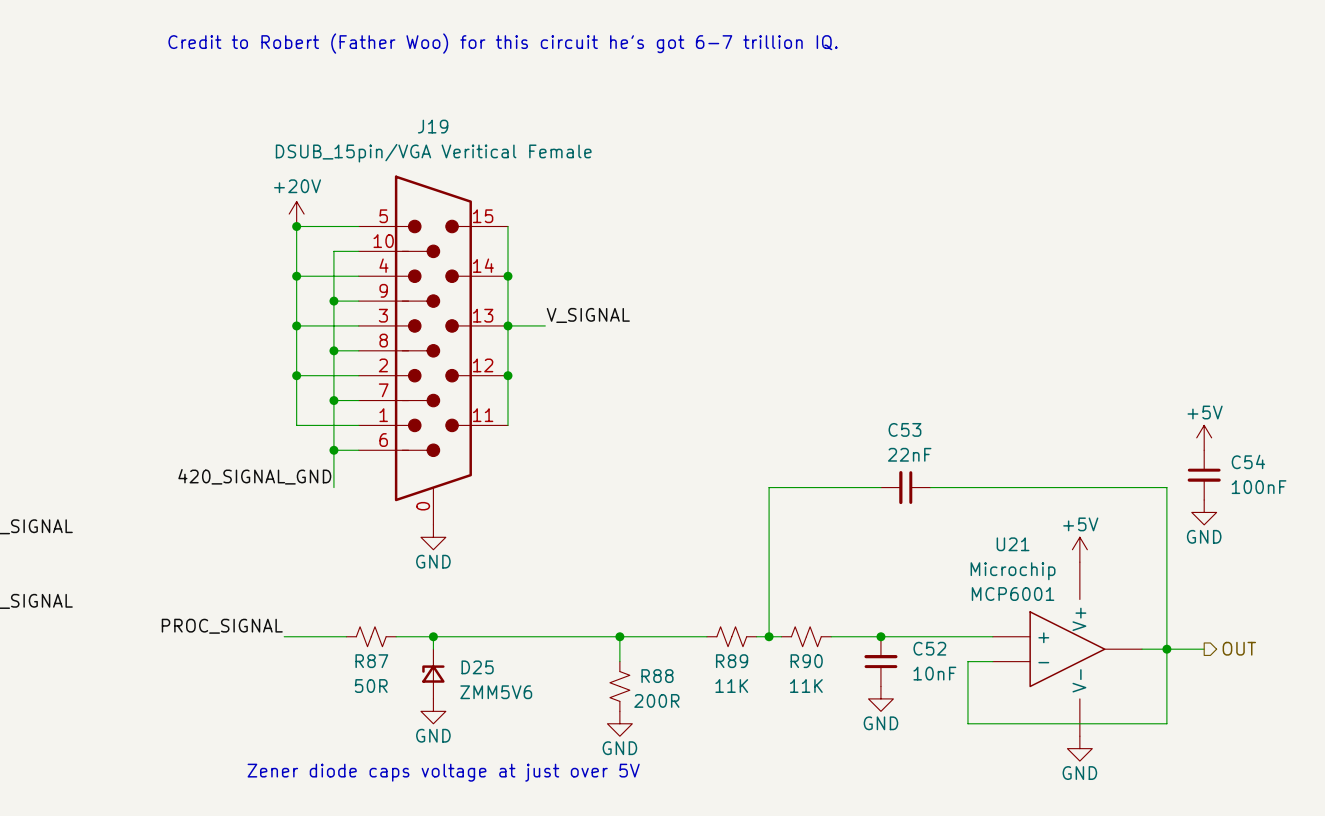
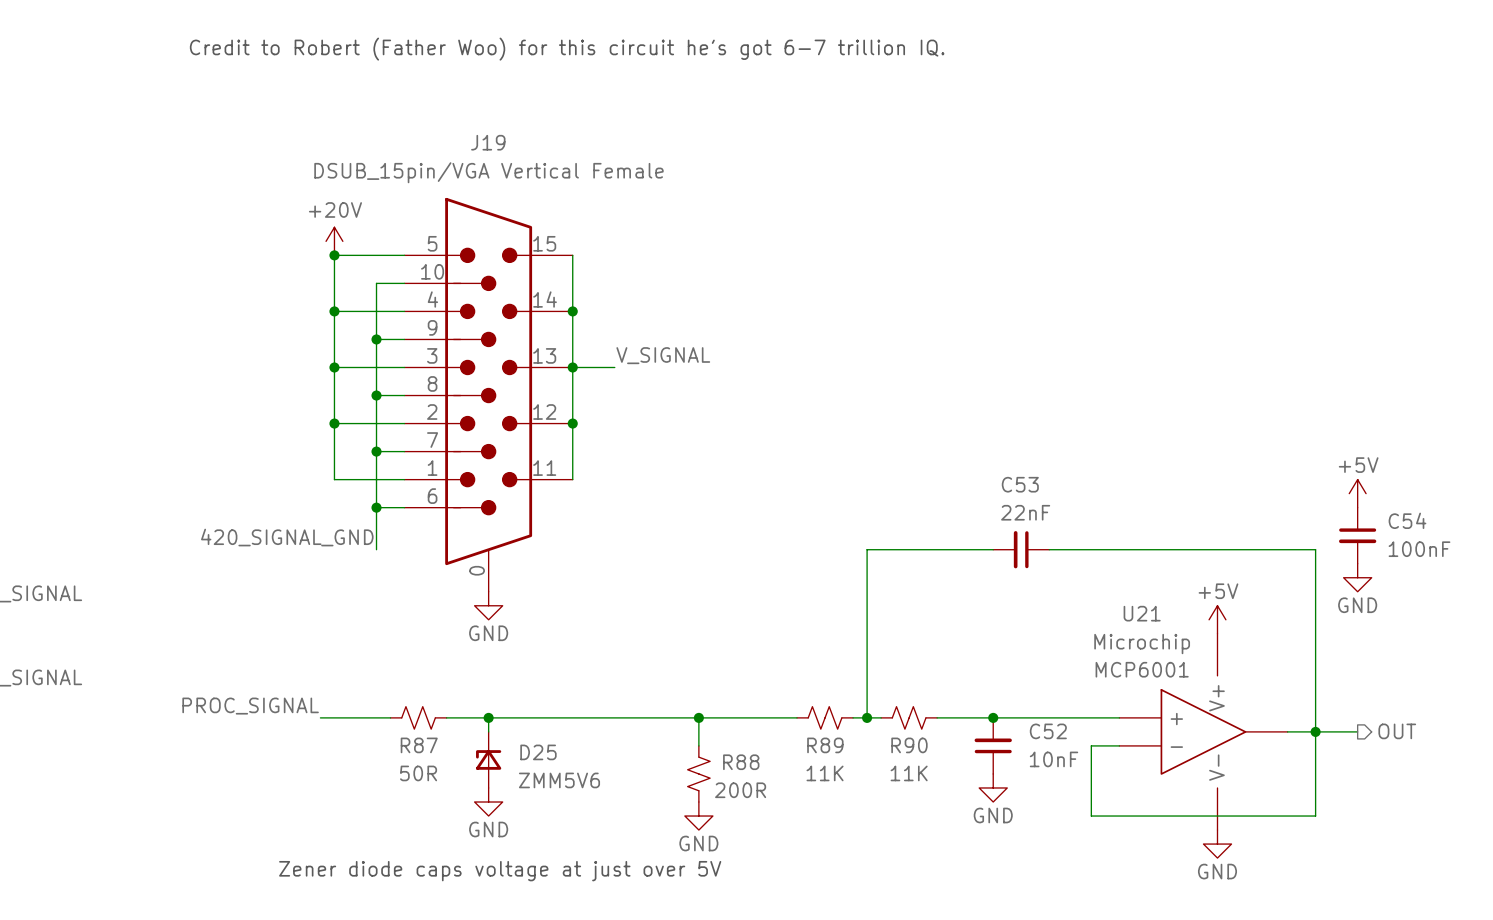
J19 value: DSUB_15pin/VGA Veritical Female (433, 153) -> DSUB_15pin/VGA Vertical Female (488, 172)

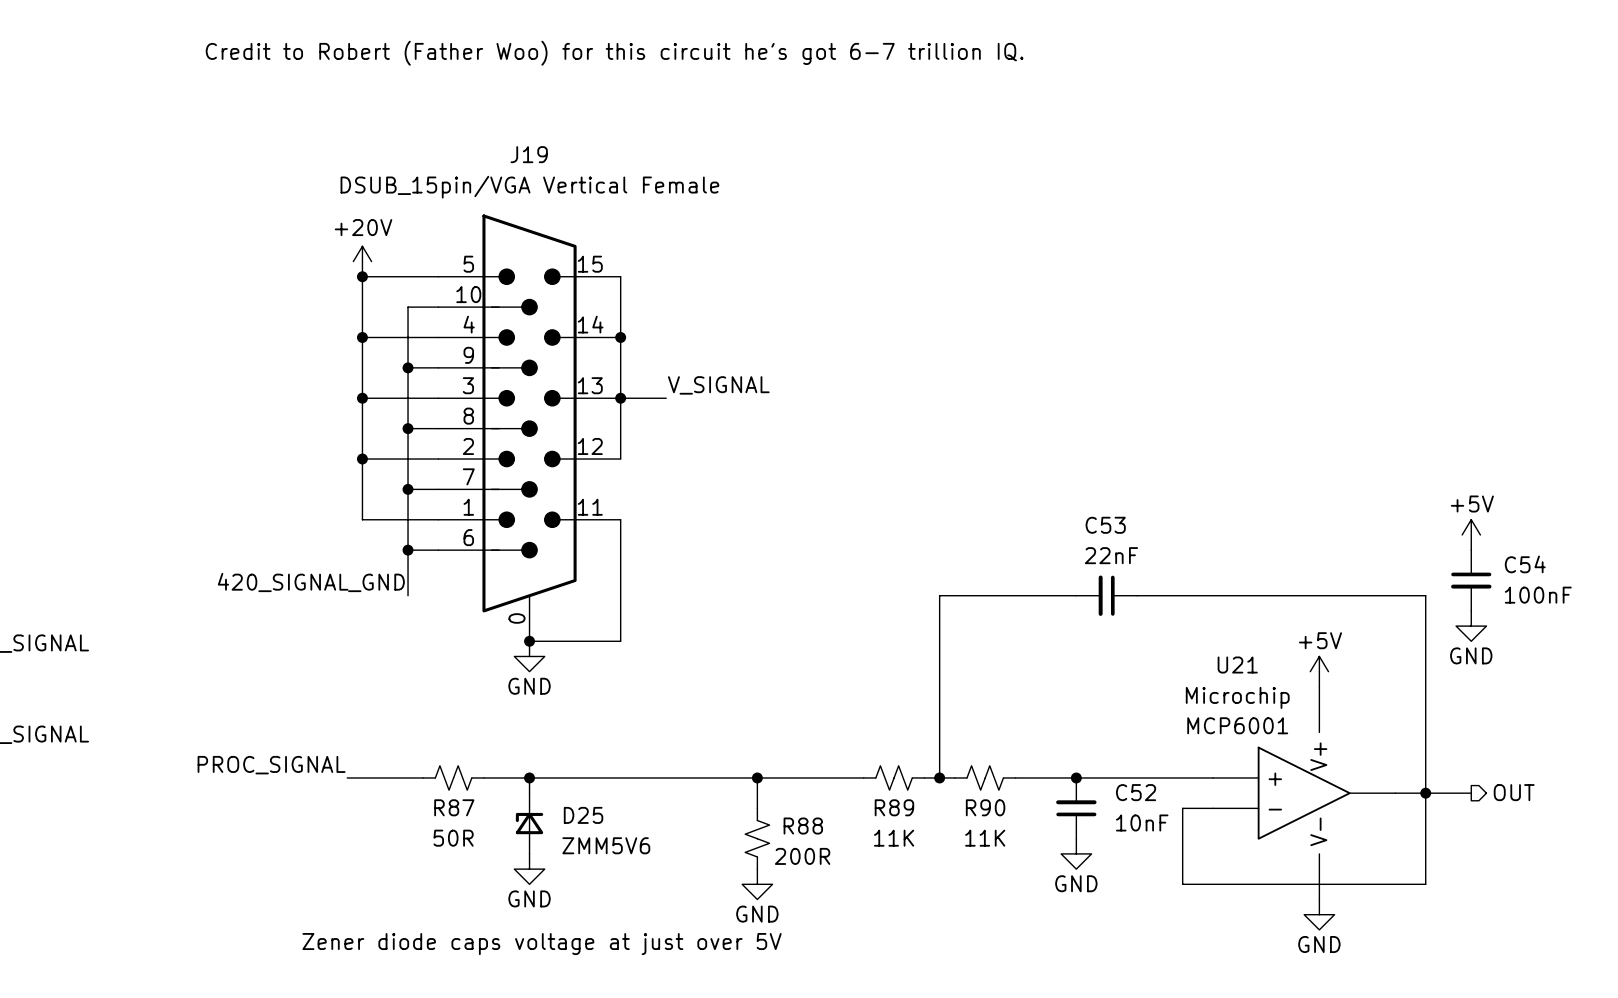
wire: (572, 423) (572, 479) -> (529, 641) (620, 641) (620, 519)
junction: (572, 423) -> none
junction: none -> (529, 641)

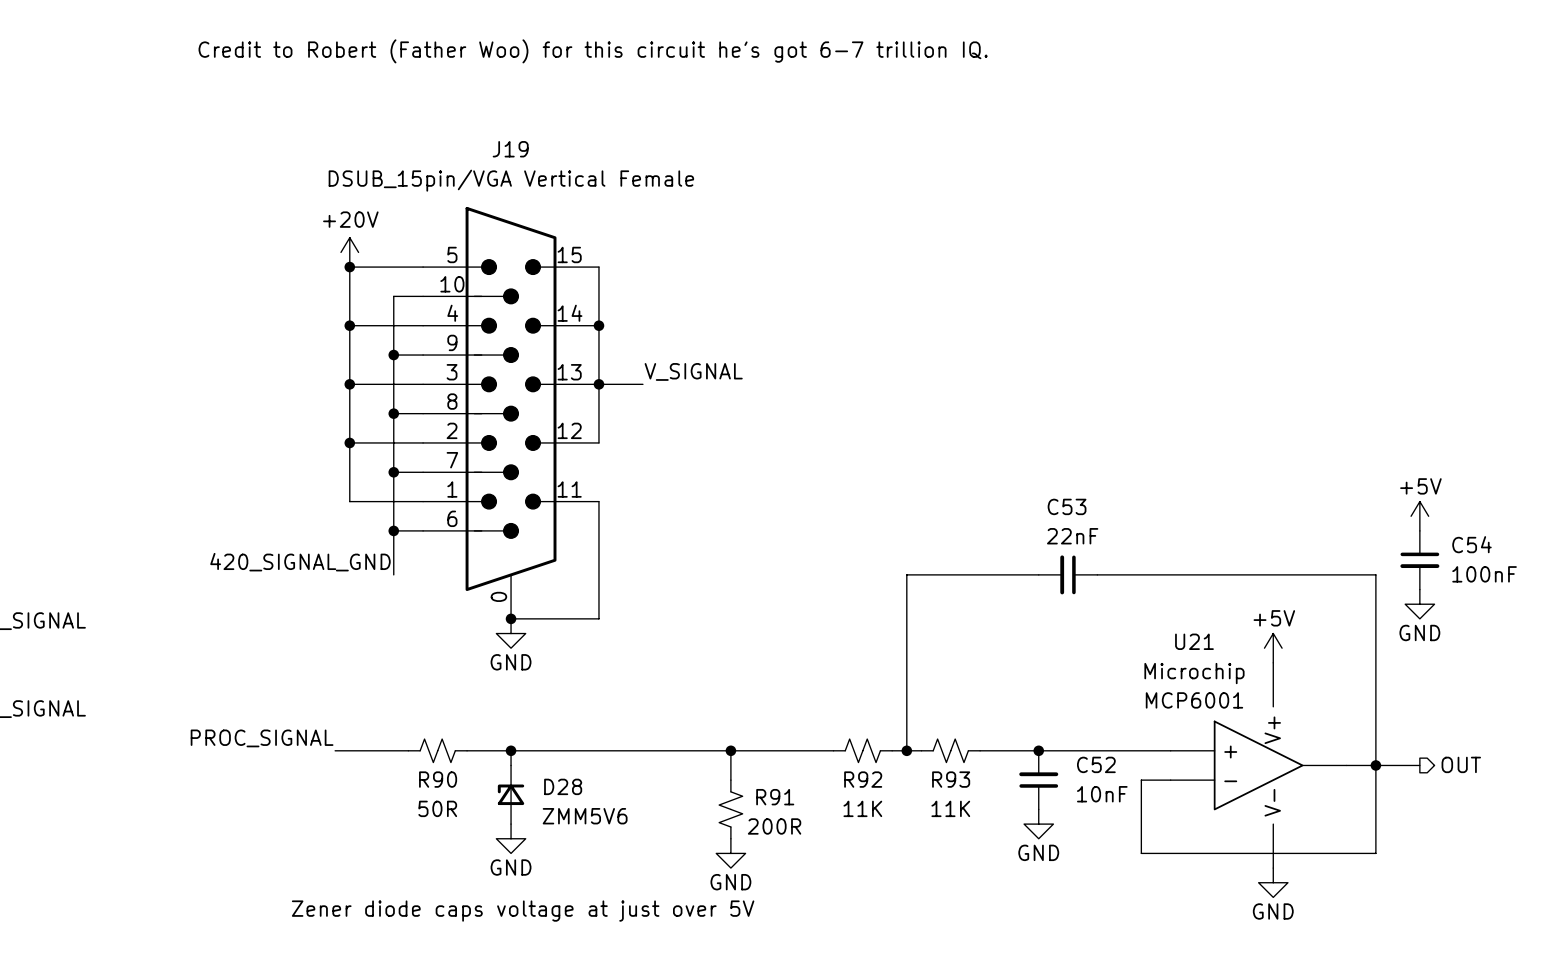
R87 name: R87 (454, 807) -> R90 (438, 779)
R89 name: R89 (894, 807) -> R92 (863, 779)
R90 name: R90 (985, 807) -> R93 (951, 779)
D25 name: D25 (583, 815) -> D28 (563, 786)
R88 name: R88 (803, 826) -> R91 (775, 797)

